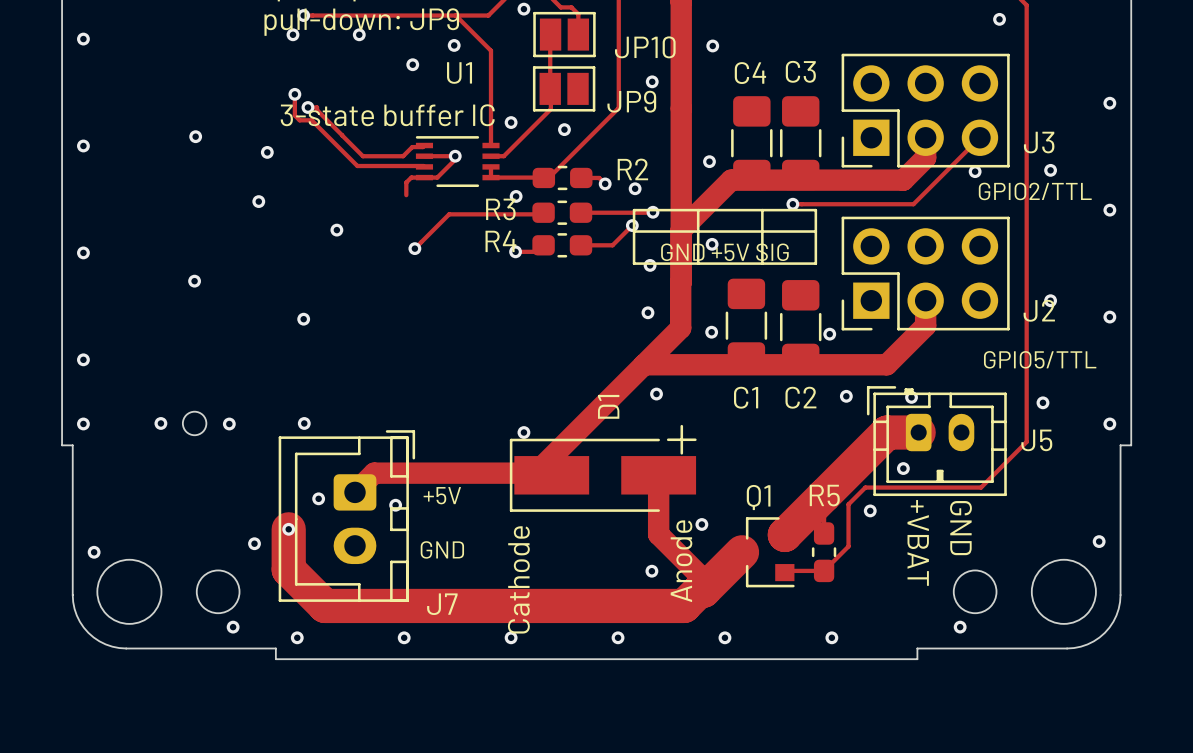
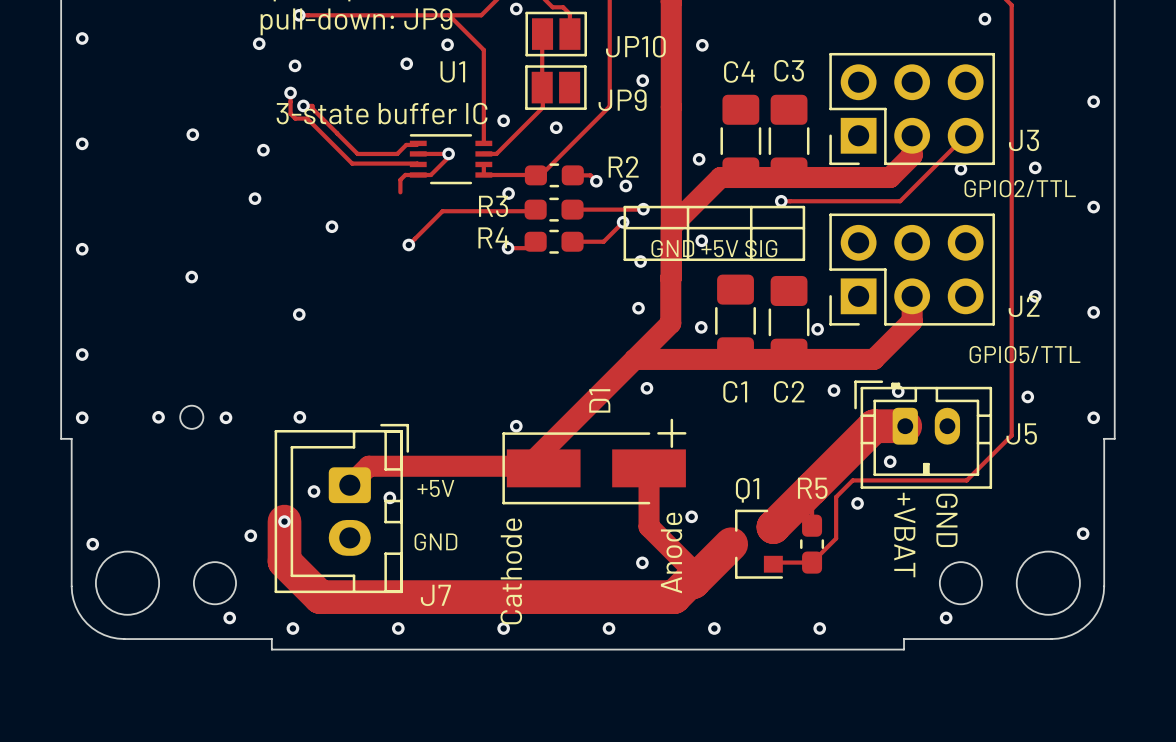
via: (292, 34) -> none
via: (359, 34) -> none
via: none -> (259, 43)
via: none -> (295, 65)

